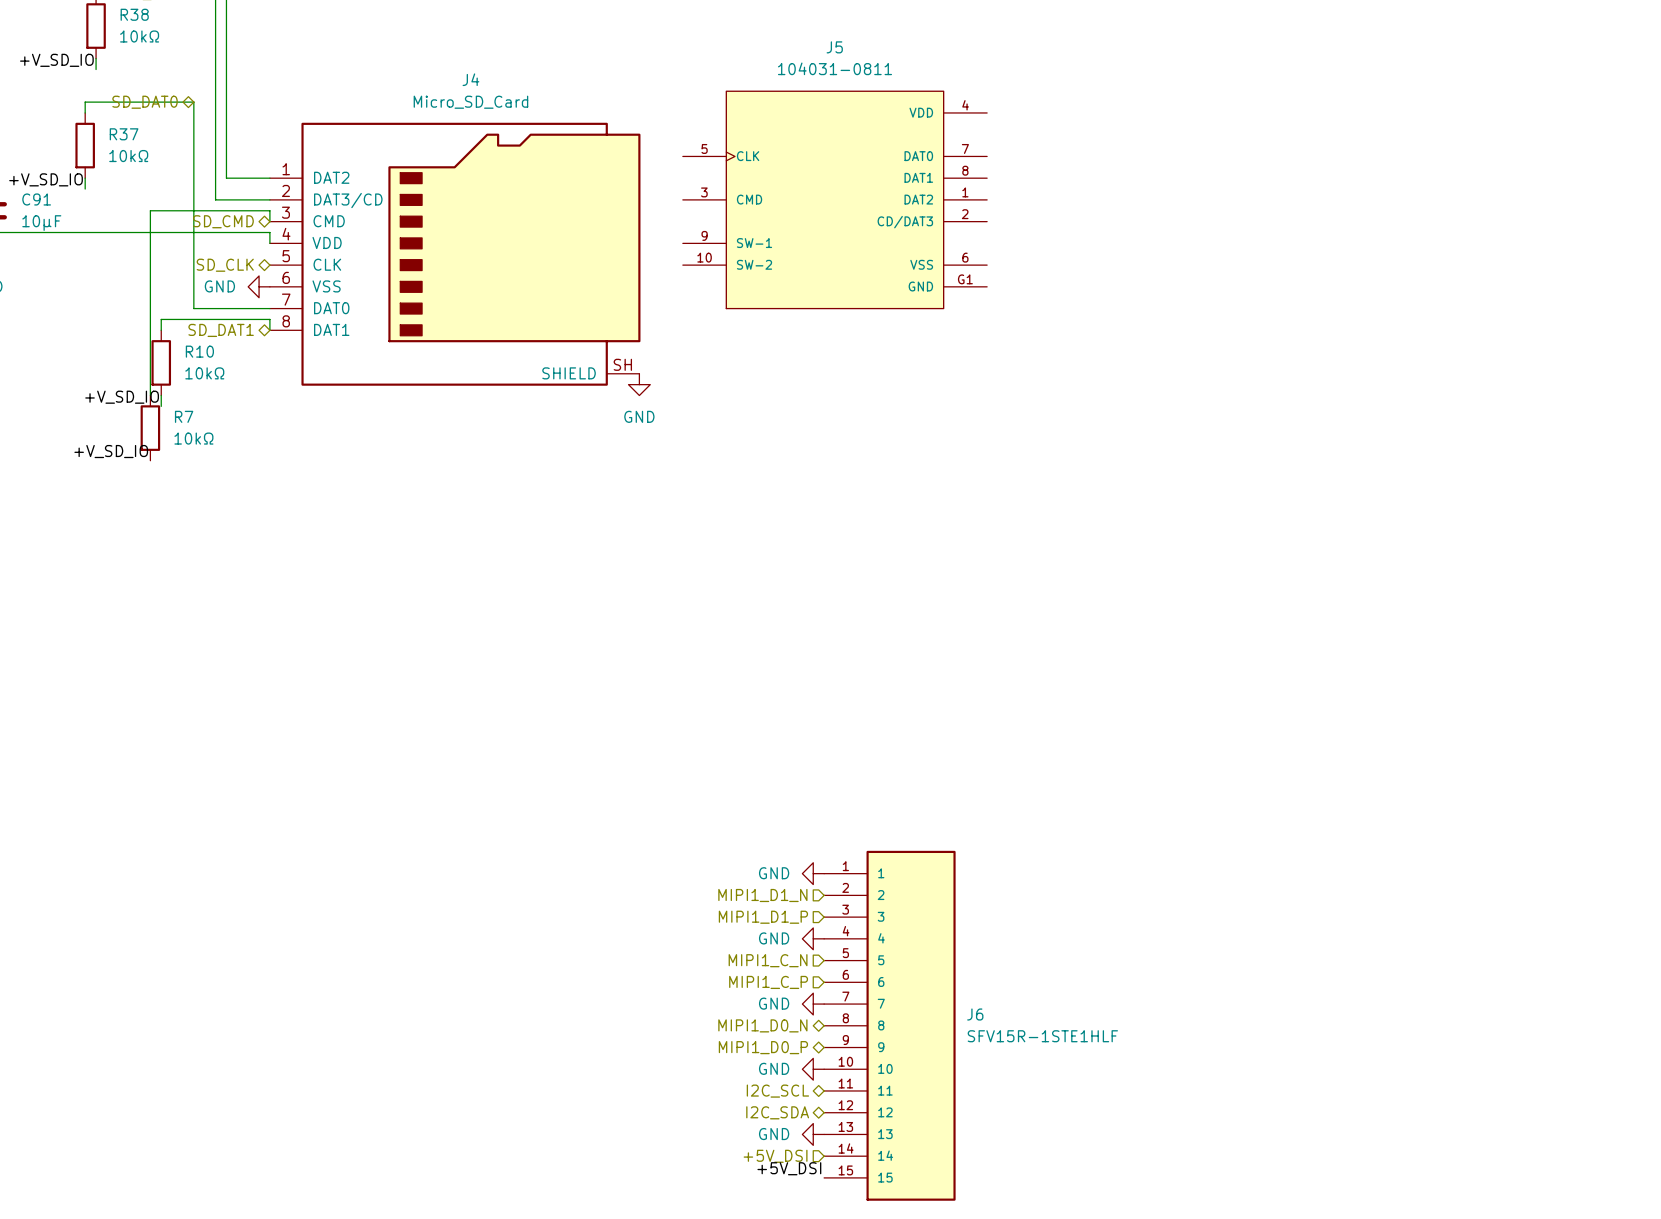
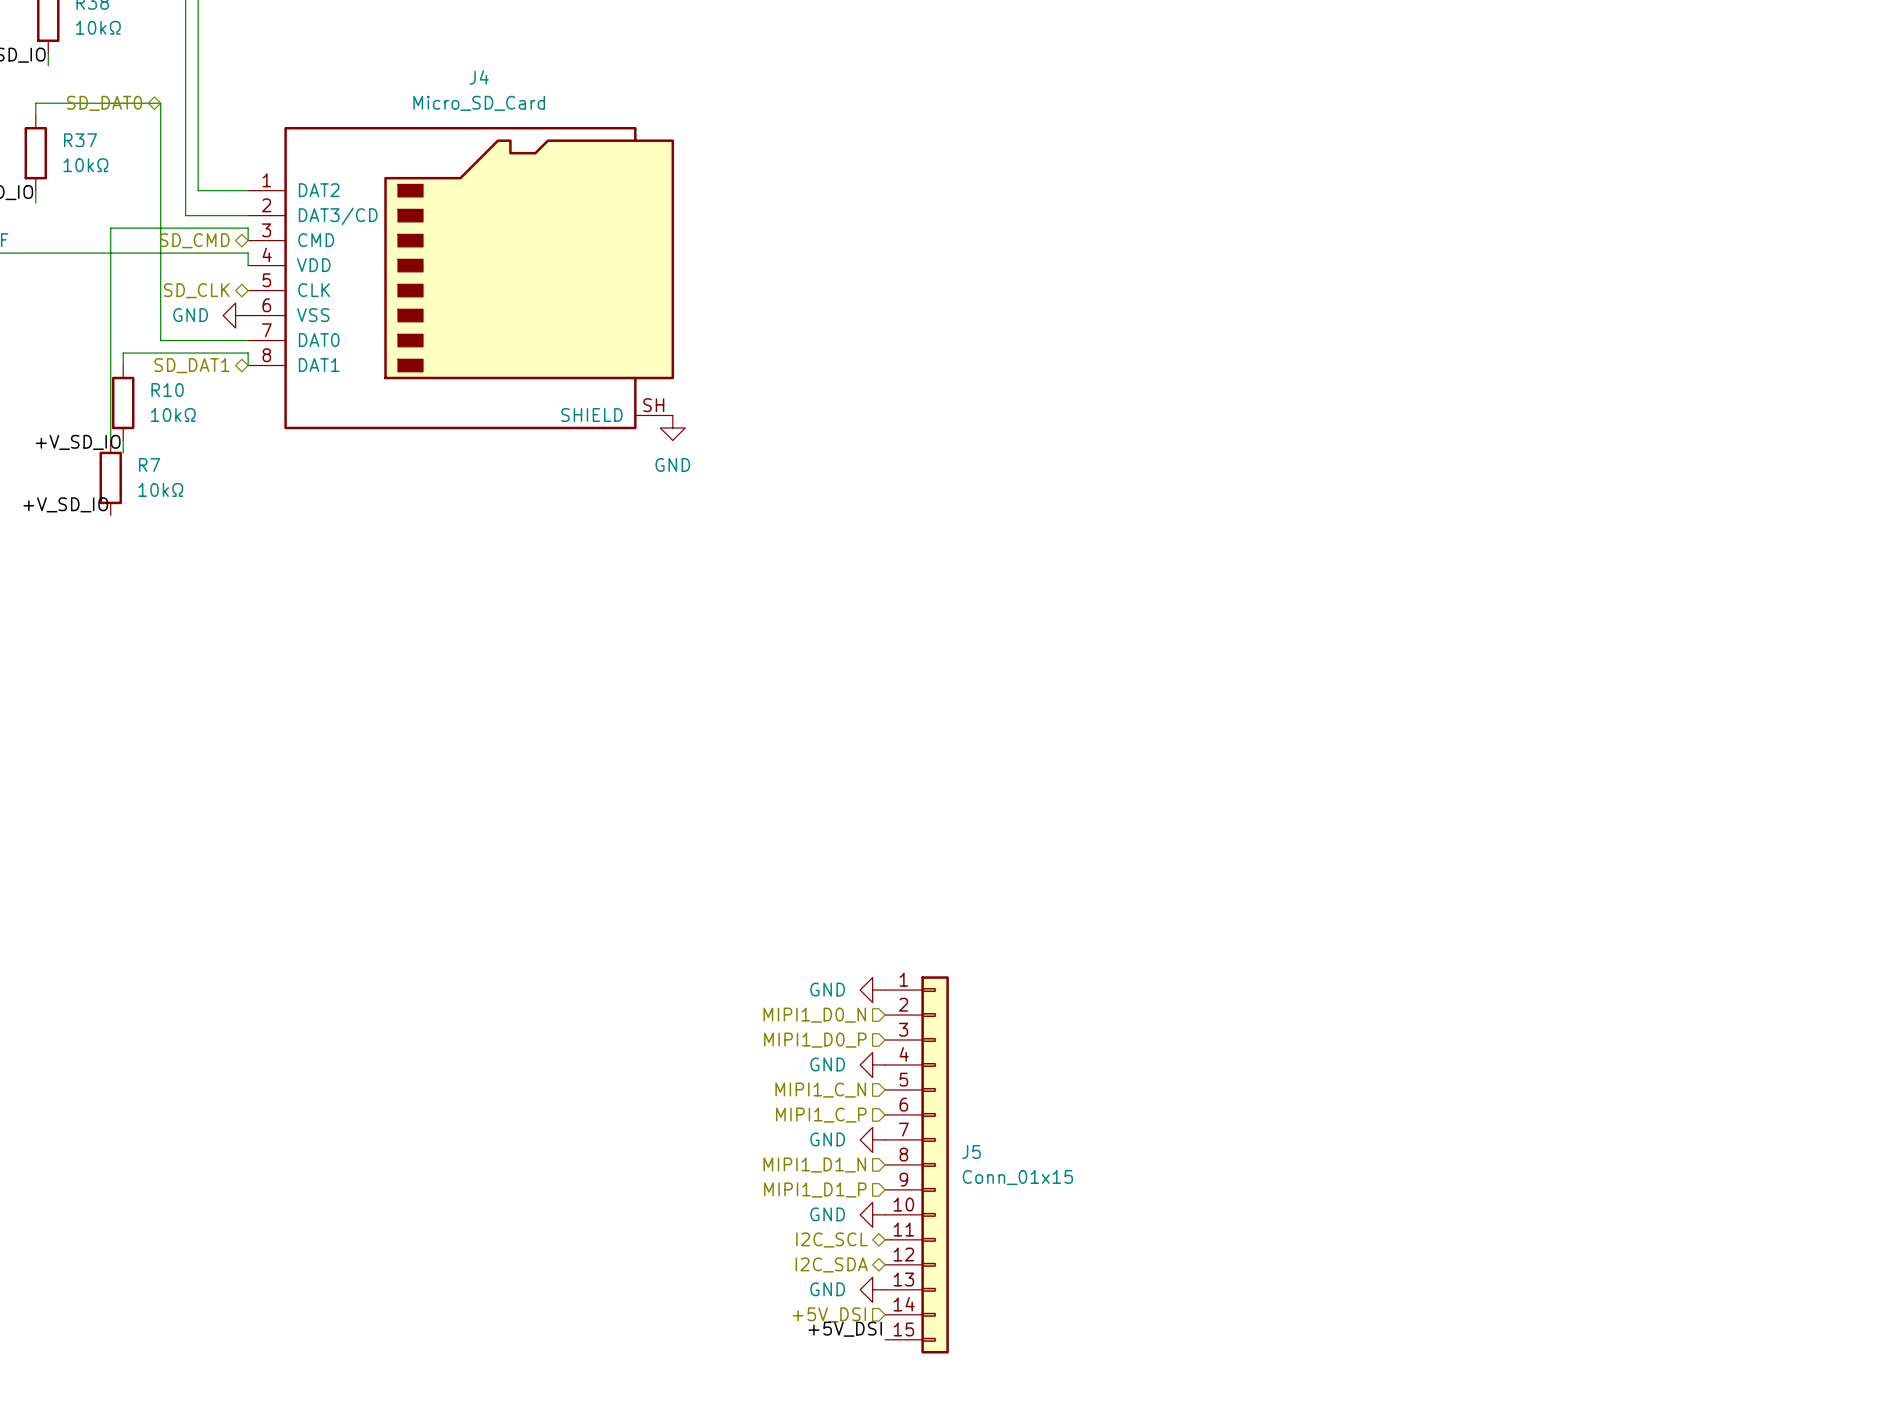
J5 name position: J5 (834, 47) -> J5 (971, 1151)
J5 value: 104031-0811 (834, 68) -> Conn_01x15 (1017, 1177)
J5 symbol: [682, 90, 988, 310] -> [885, 976, 949, 1354]
hierarchical label: MIPI1_D1_N (762, 895) -> MIPI1_D0_N (814, 1015)
hierarchical label: MIPI1_D1_P (763, 917) -> MIPI1_D0_P (815, 1040)
hierarchical label shape: bidirectional (762, 1025) -> input (814, 1165)
hierarchical label: MIPI1_D0_N (762, 1025) -> MIPI1_D1_N (814, 1165)
J6: SFV15R-1STE1HLF (889, 1025) -> none
hierarchical label shape: bidirectional (763, 1047) -> input (815, 1190)
hierarchical label: MIPI1_D0_P (763, 1047) -> MIPI1_D1_P (815, 1190)

